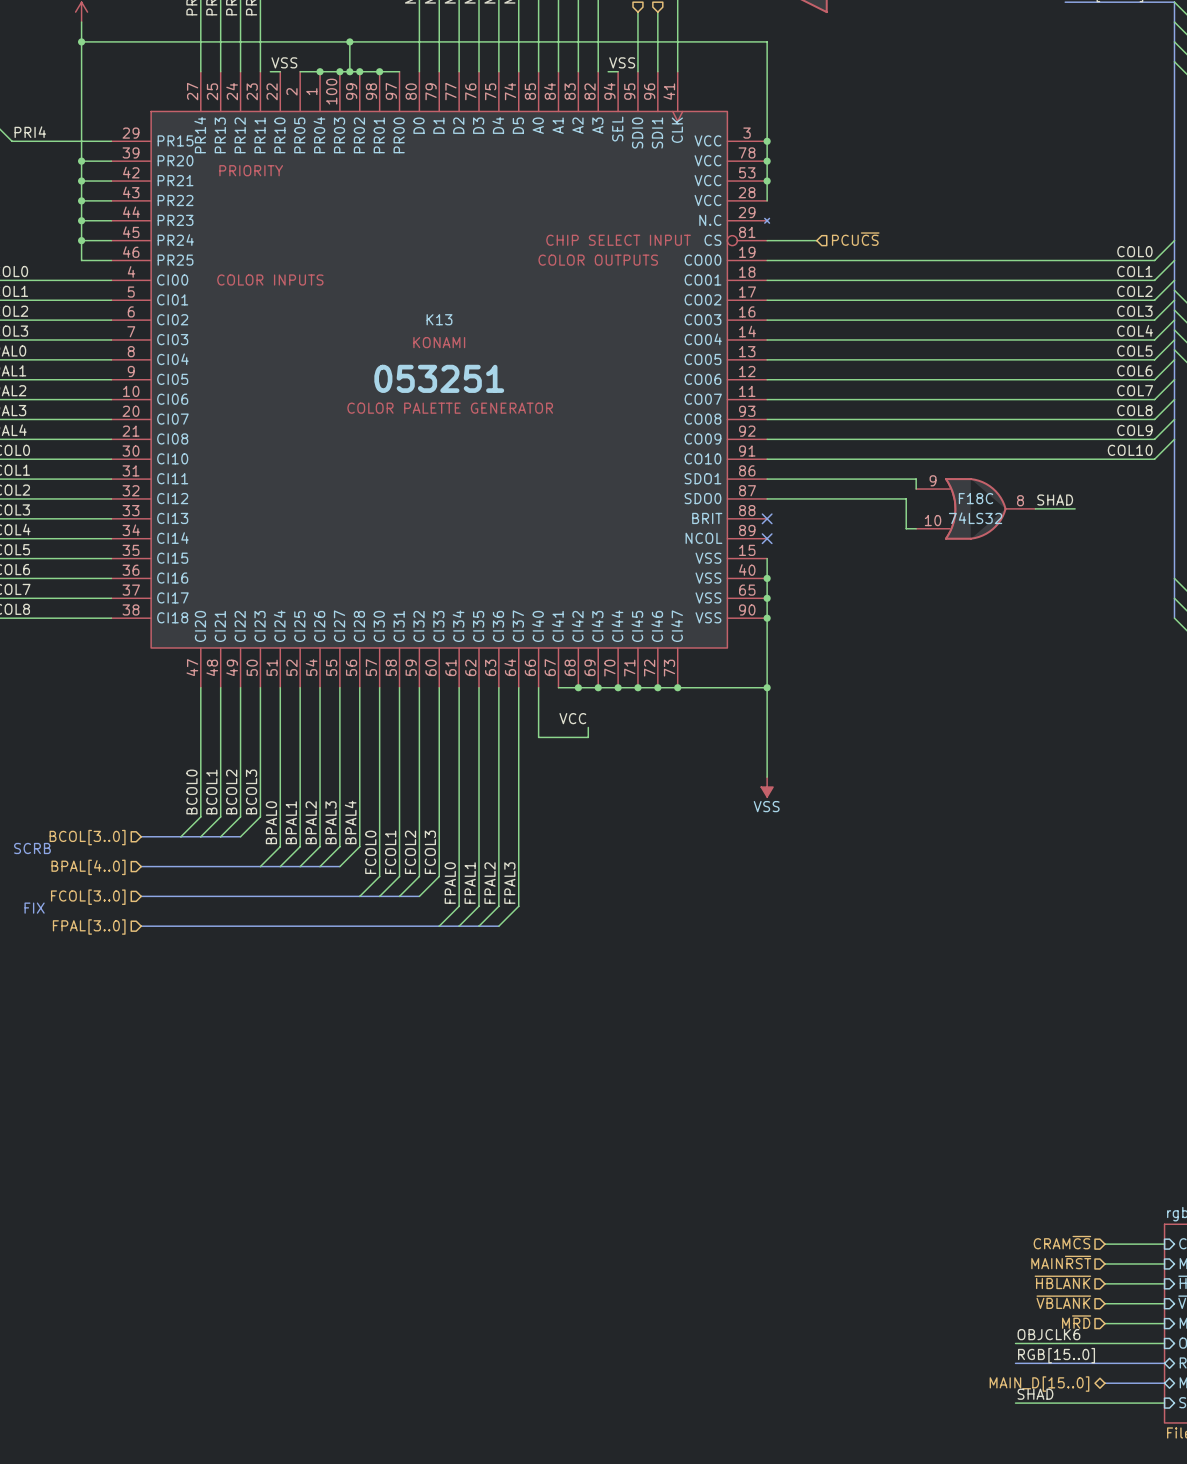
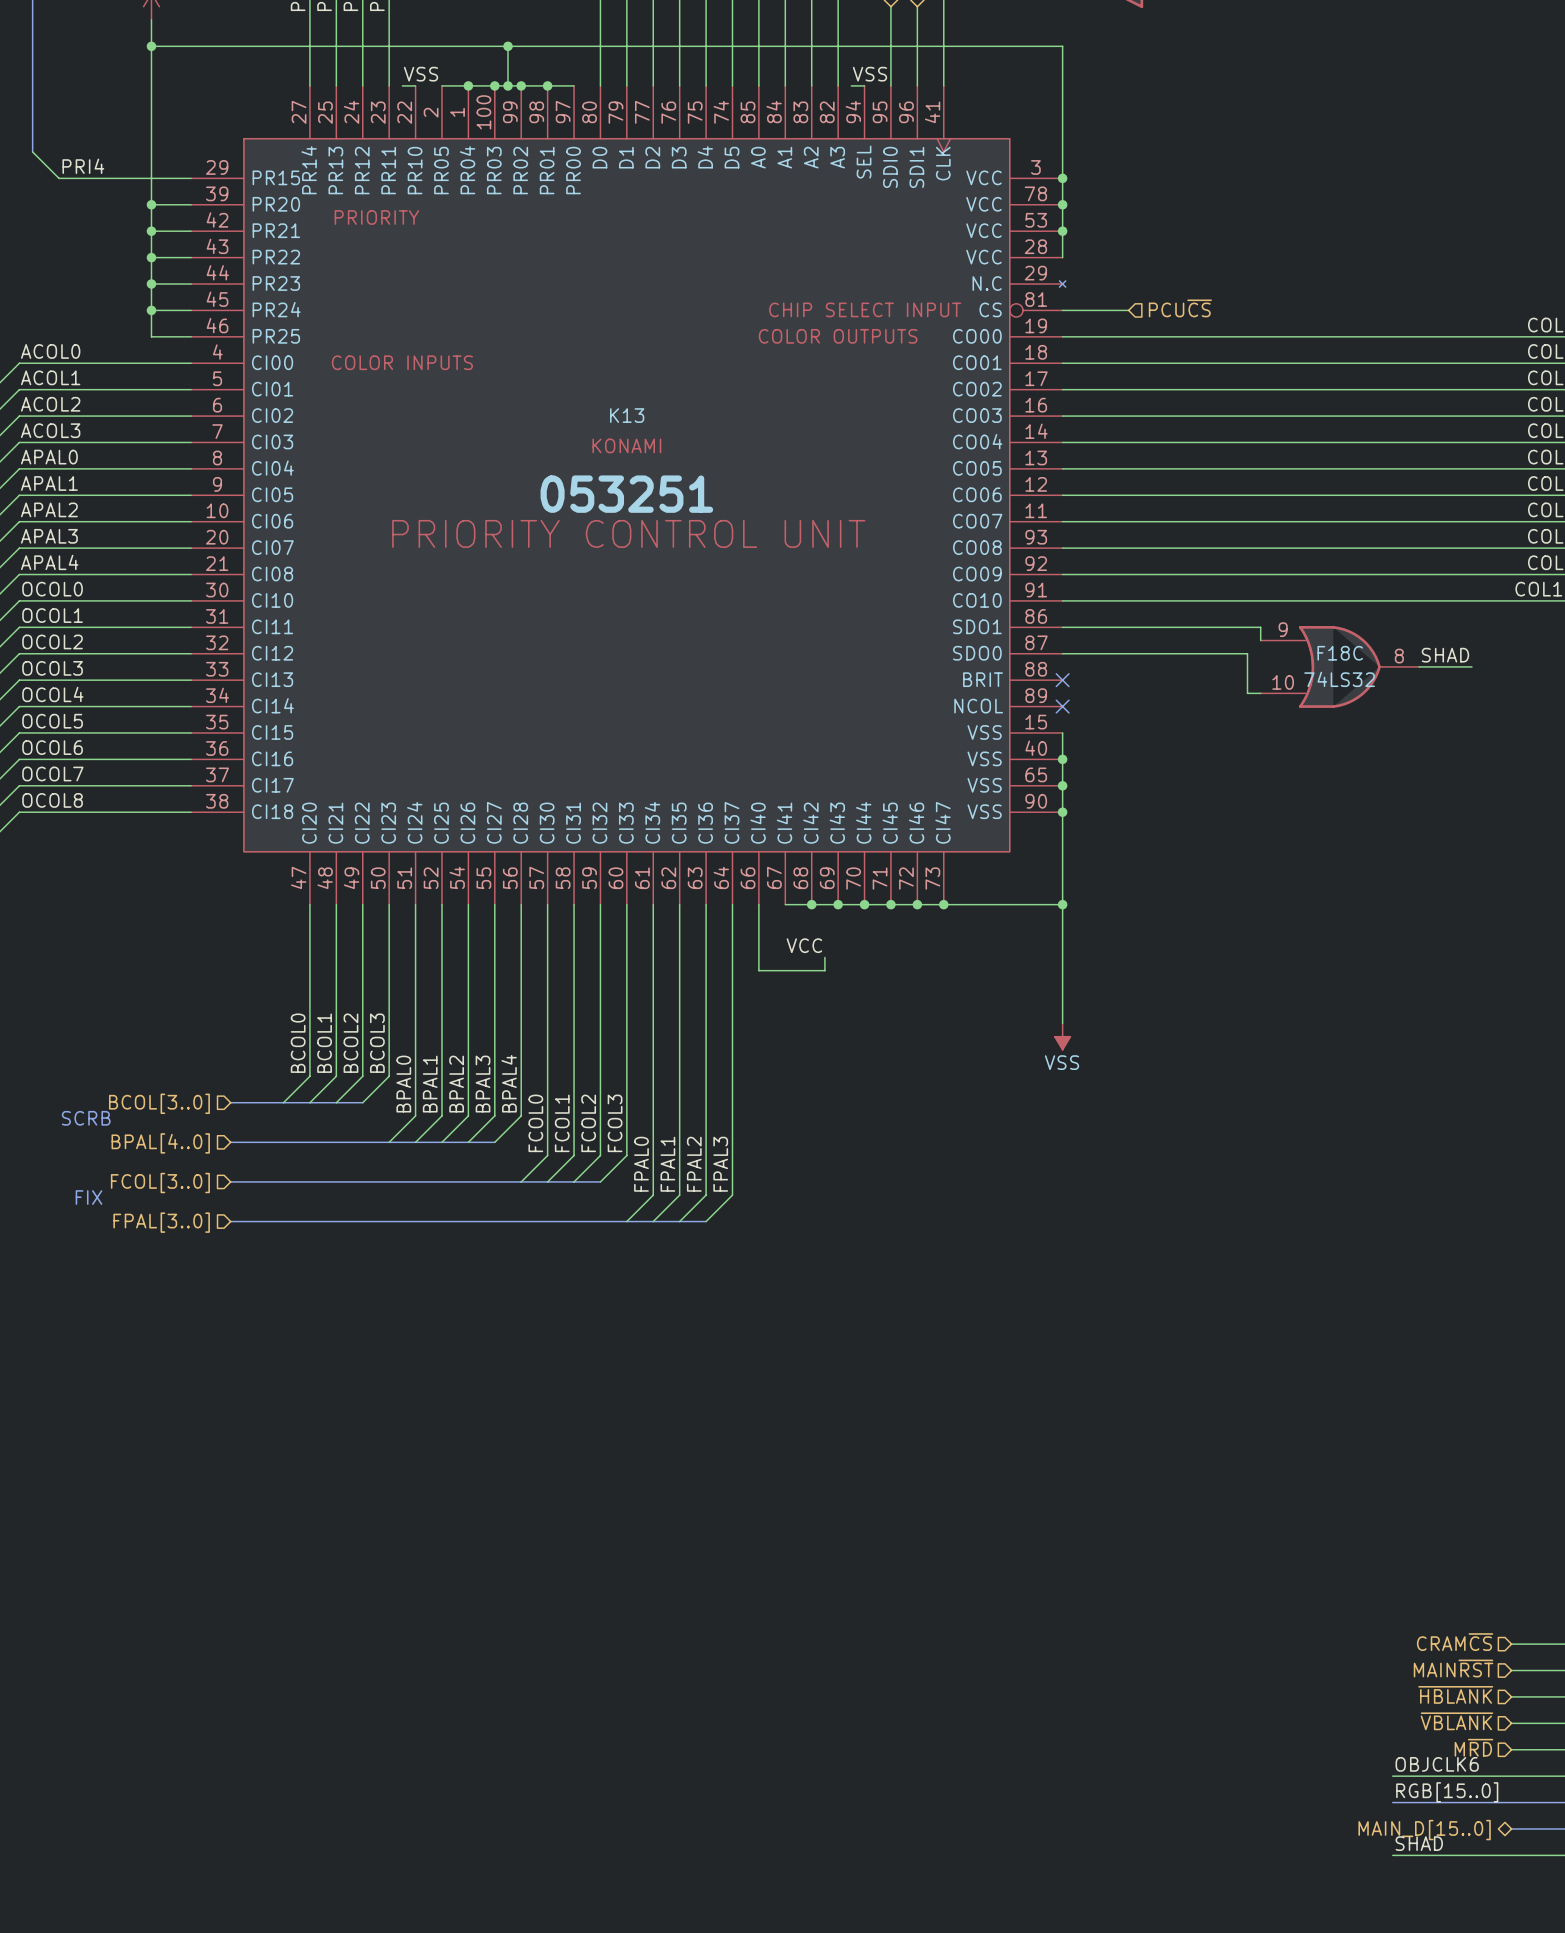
K13 text: none -> PRIORITY CONTROL UNIT (628, 533)
K13 text: COLOR PALETTE GENERATOR (450, 408) -> none

